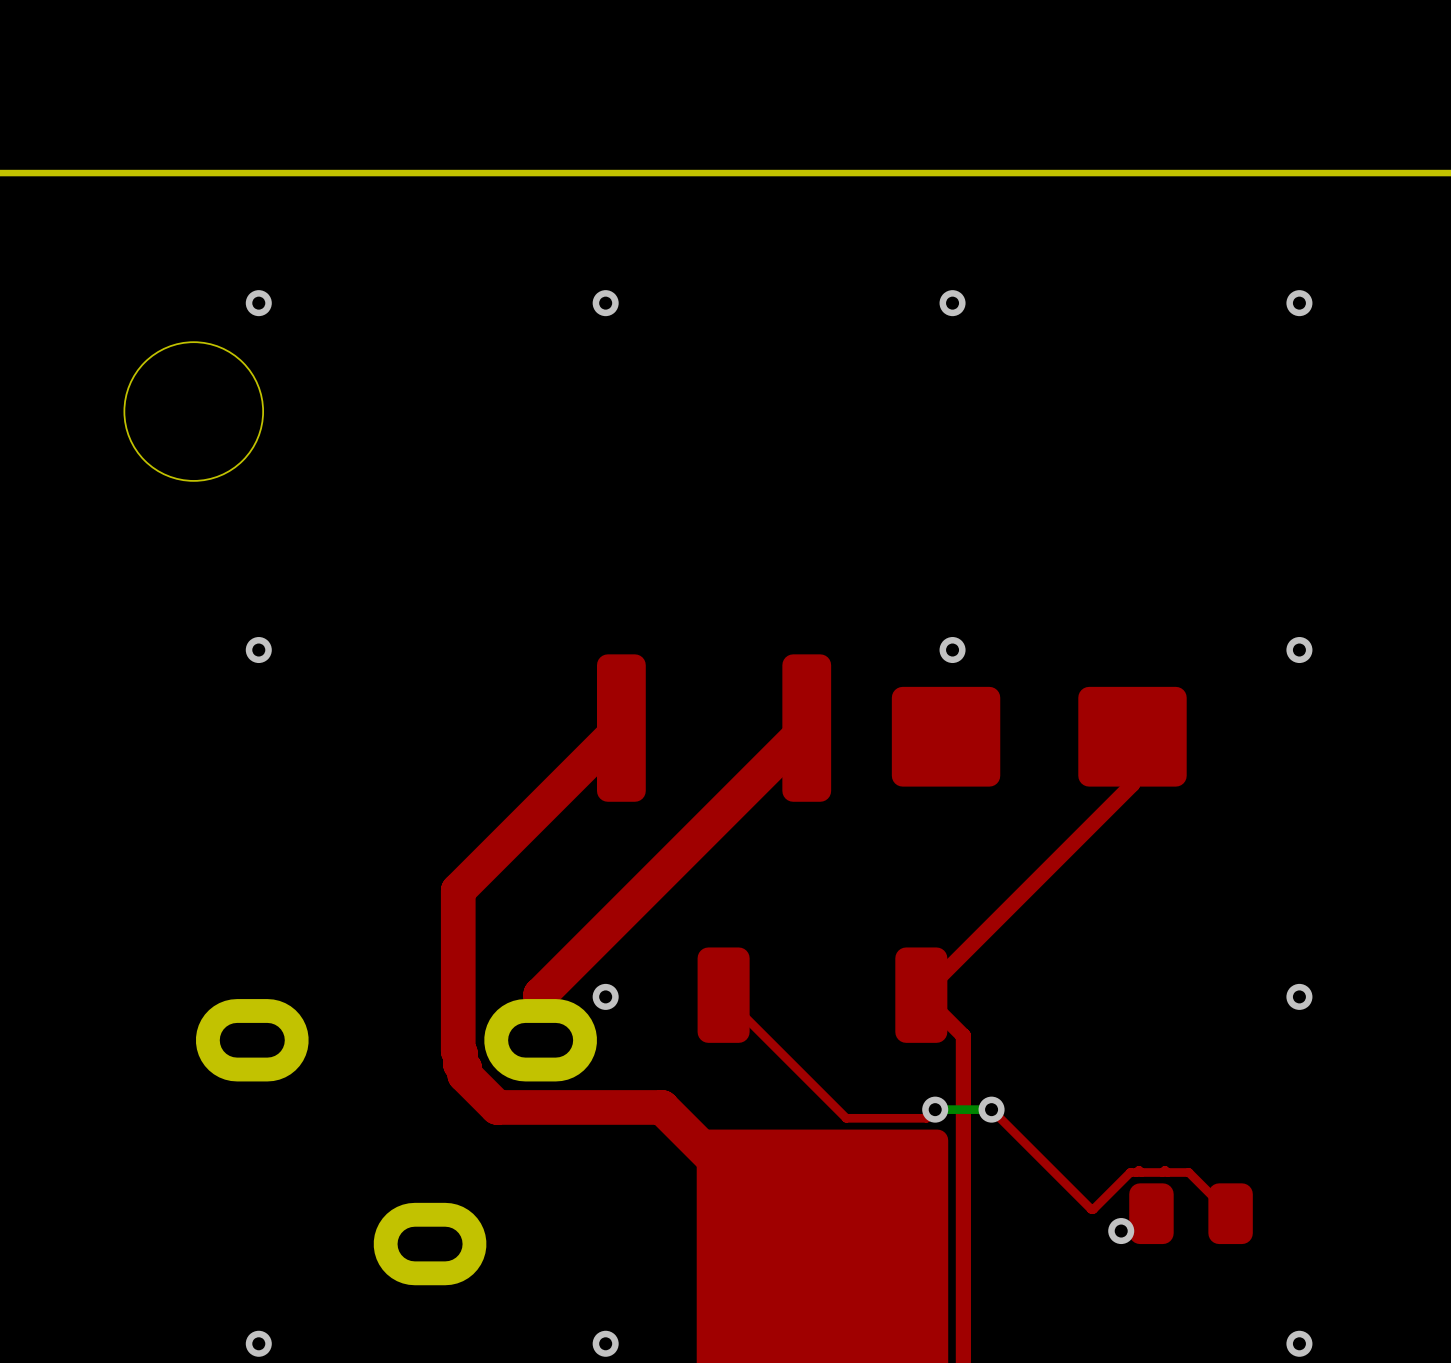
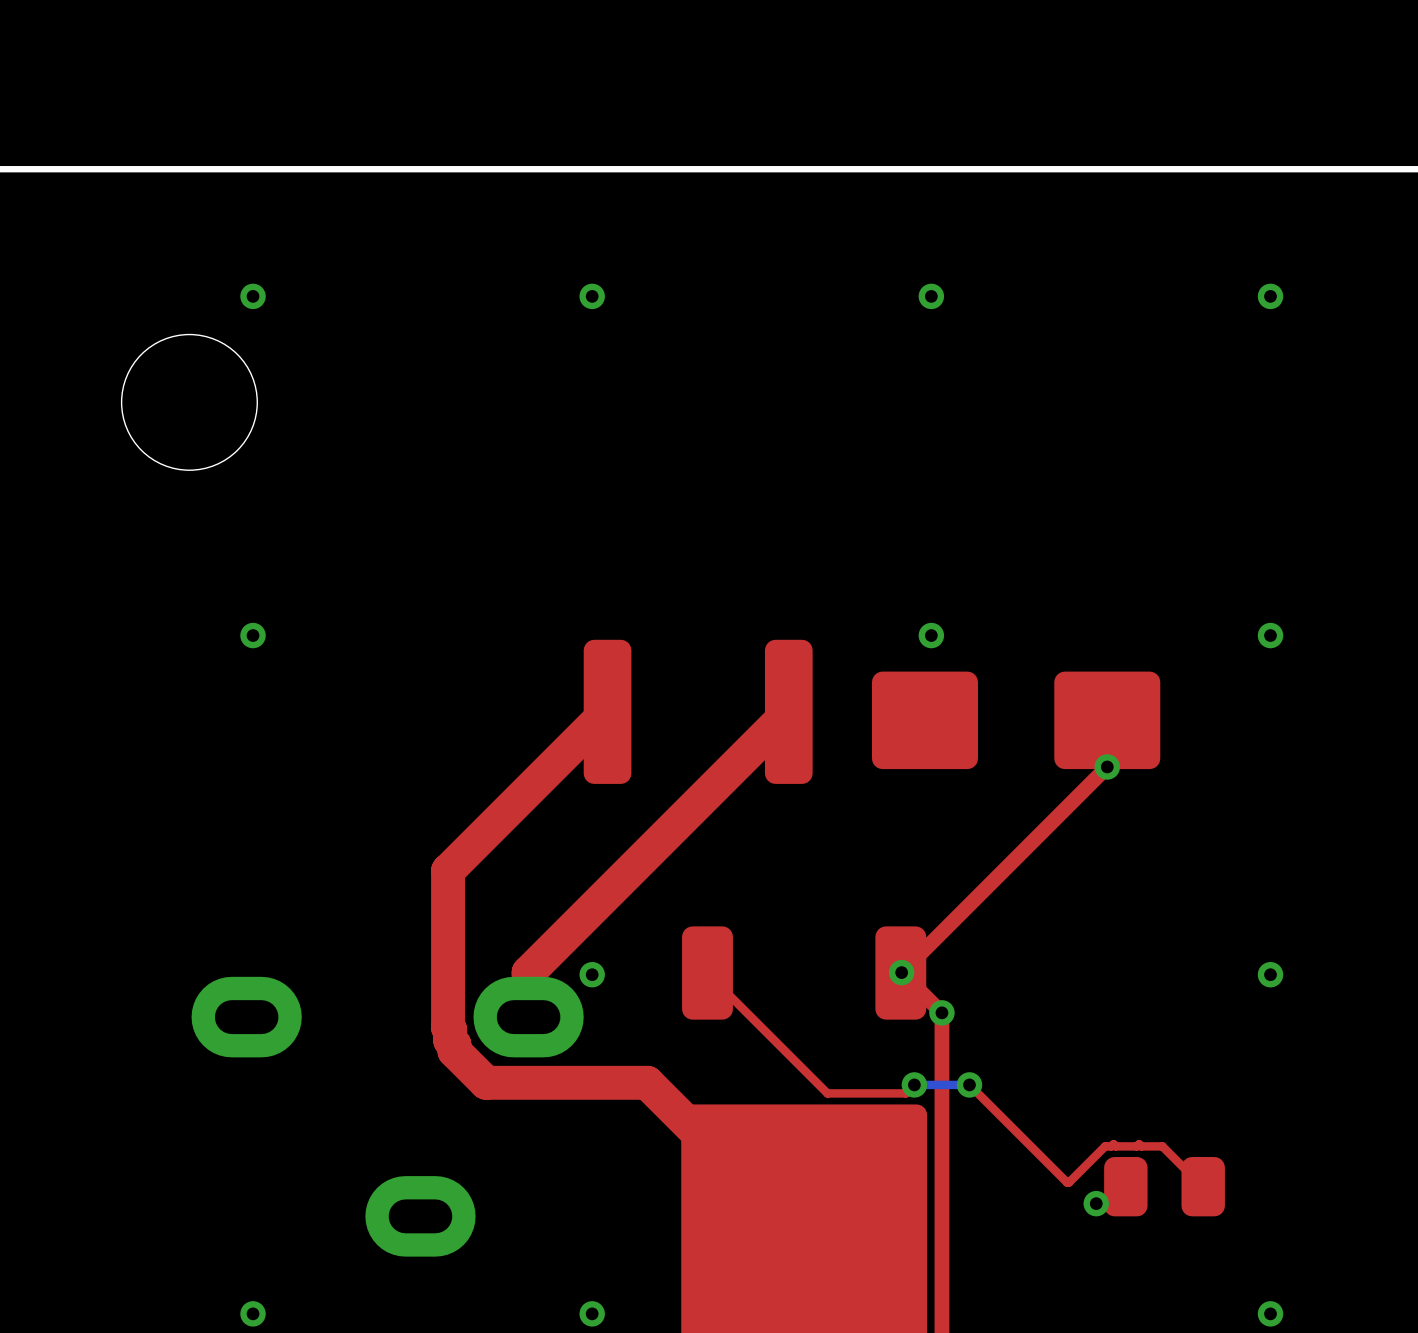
via: none -> (1107, 766)
via: none -> (901, 972)
via: none -> (941, 1012)

